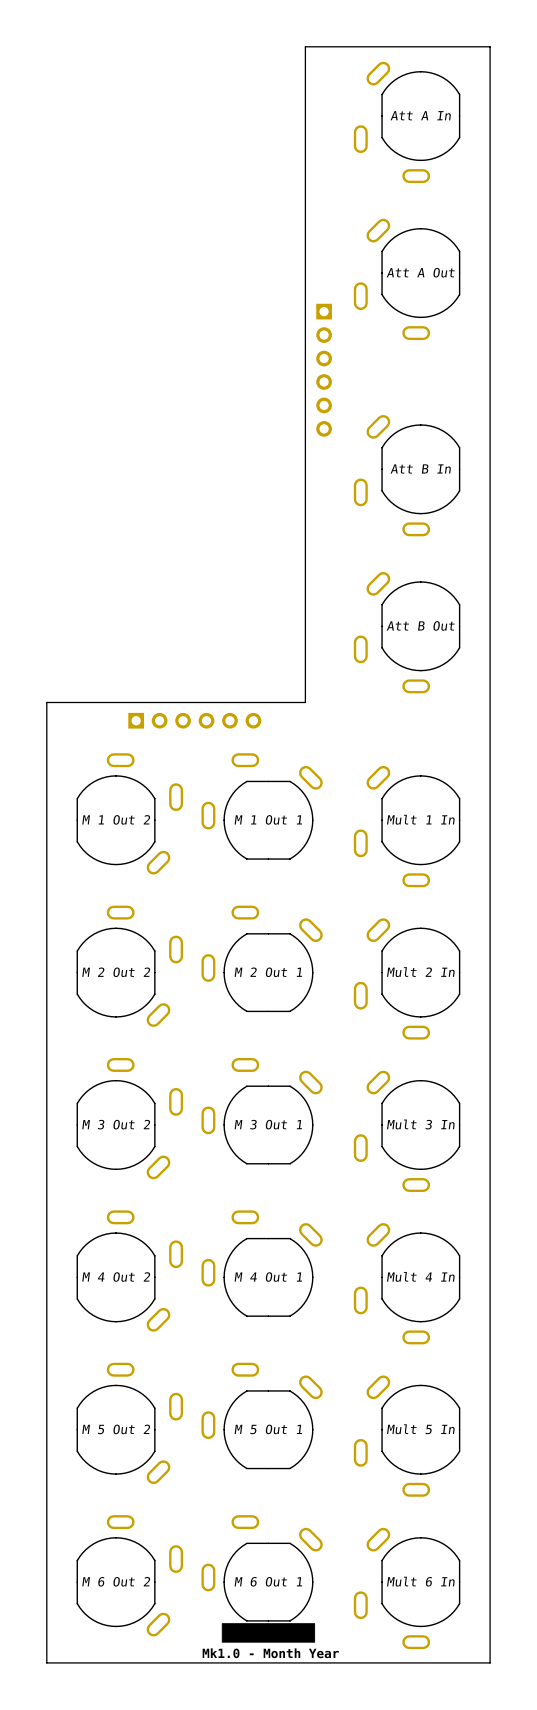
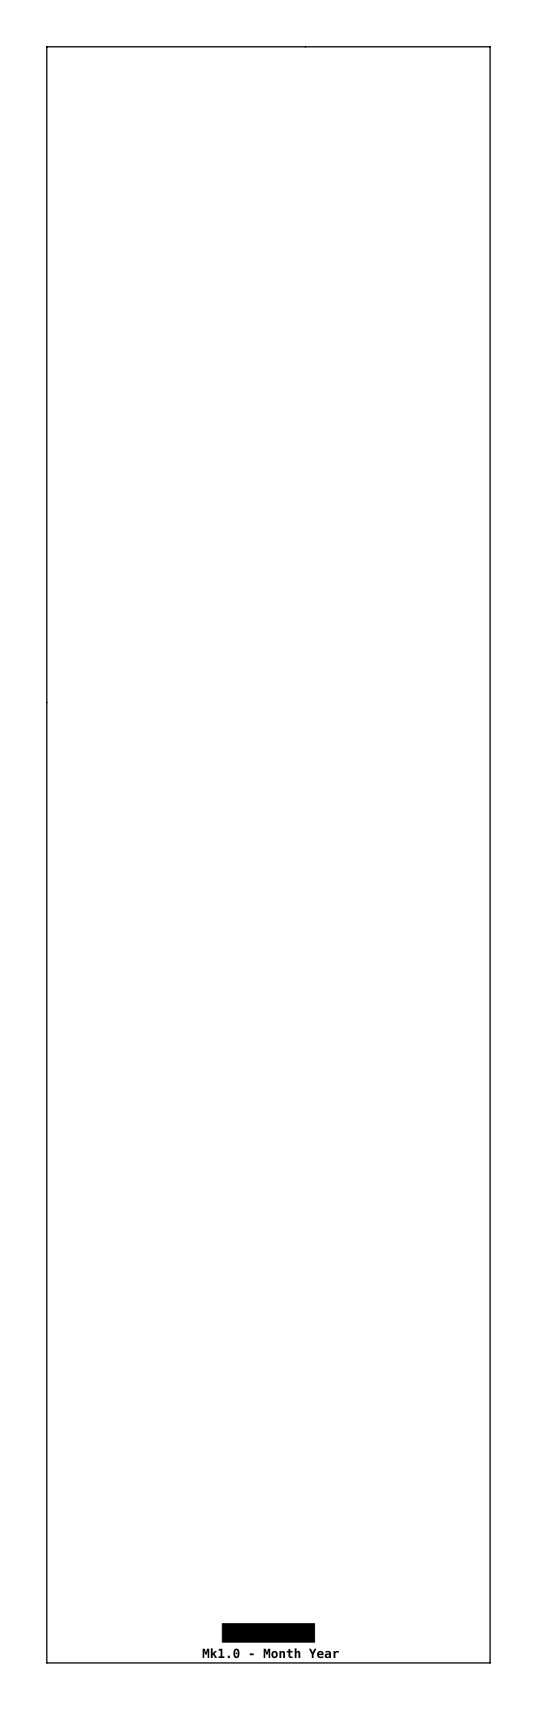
board edge: (305, 46) (305, 702) (46, 702) -> (305, 46) (46, 46) (46, 702)
part: (407, 122) -> none
part: (407, 279) -> none
part: (324, 370) -> none
part: (407, 475) -> none
part: (407, 632) -> none
part: (194, 720) -> none
part: (262, 806) -> none
part: (129, 813) -> none
part: (407, 826) -> none
part: (262, 958) -> none
part: (129, 966) -> none
part: (407, 978) -> none
part: (262, 1111) -> none
part: (129, 1118) -> none
part: (407, 1131) -> none
part: (262, 1263) -> none
part: (129, 1271) -> none
part: (407, 1283) -> none
part: (262, 1415) -> none
part: (129, 1423) -> none
part: (407, 1436) -> none
part: (262, 1568) -> none
part: (129, 1575) -> none
part: (407, 1588) -> none

